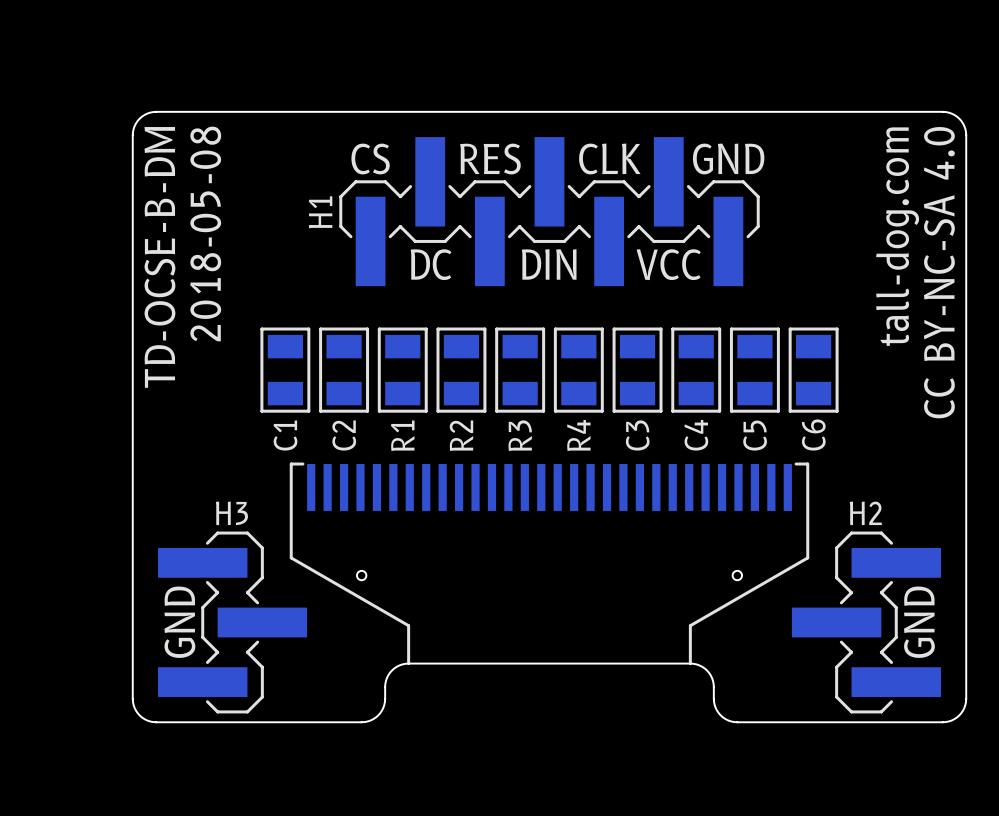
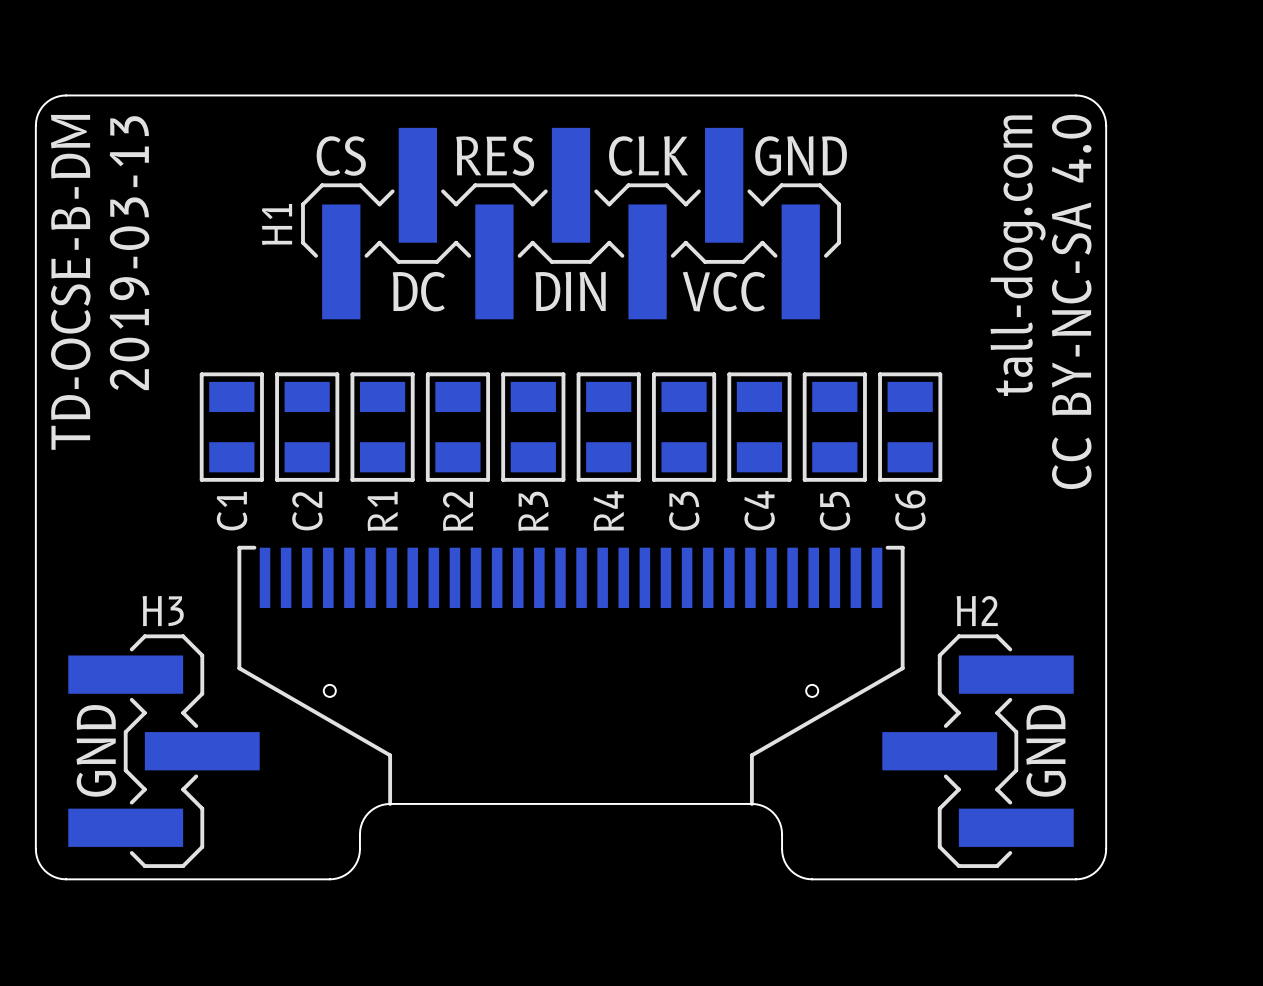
text: 2018-05-08 (205, 233) -> 2019-03-13 (129, 253)

